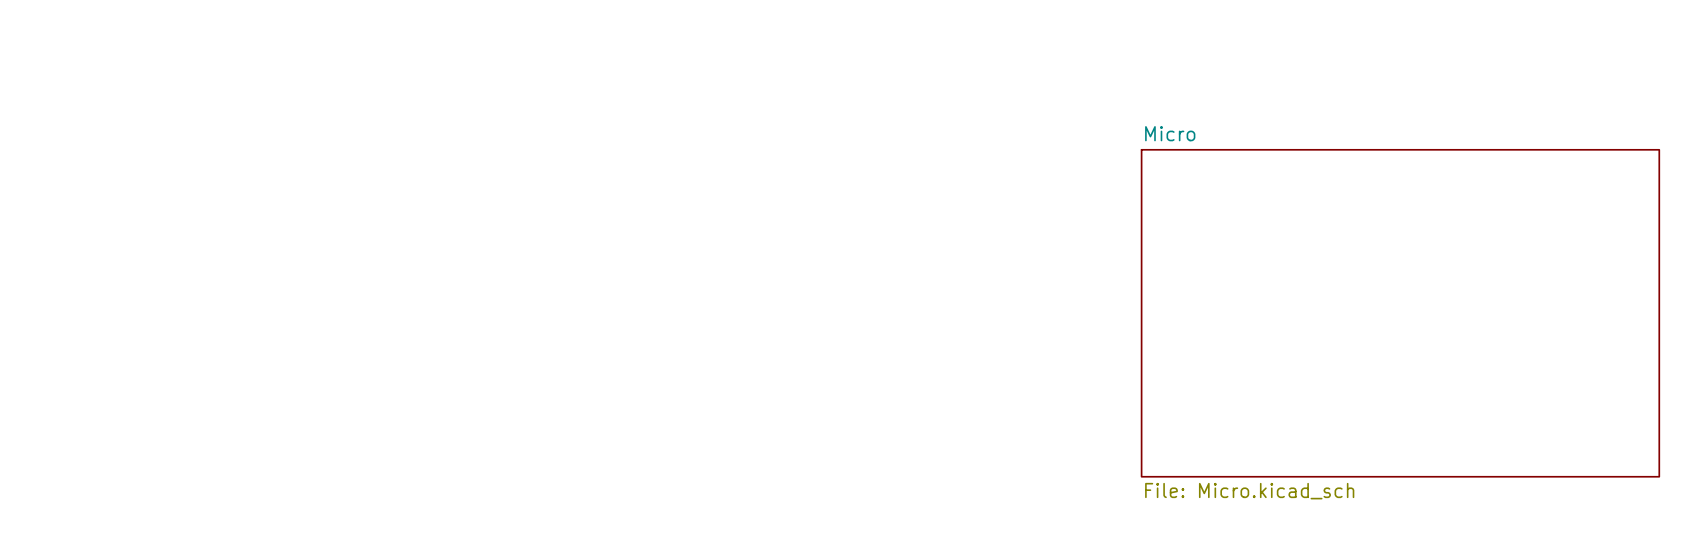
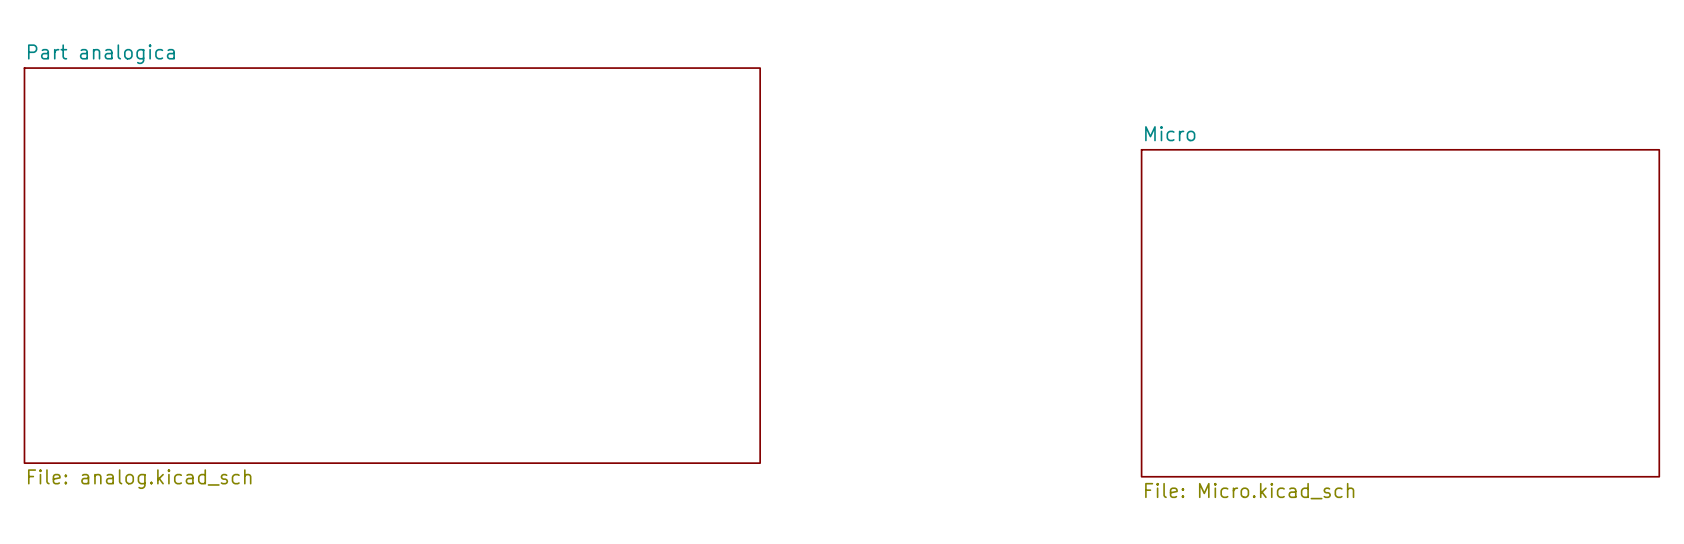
sheet Part analogica: none -> File: analog.kicad_sch (392, 265)

